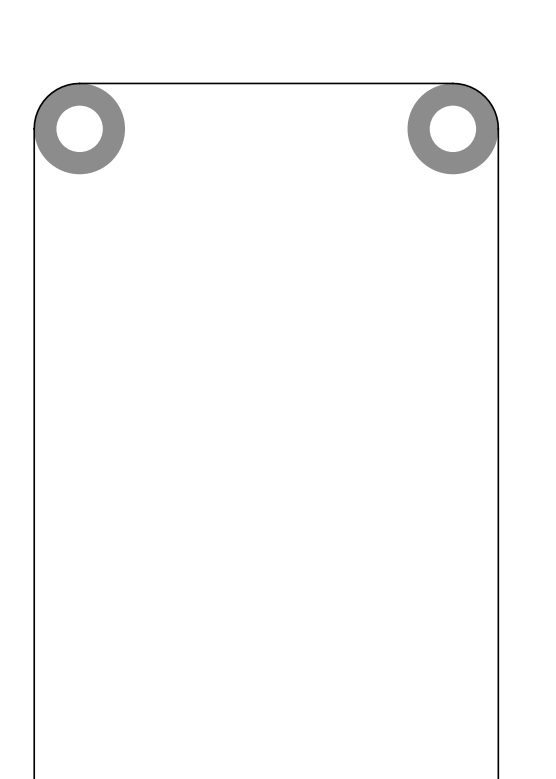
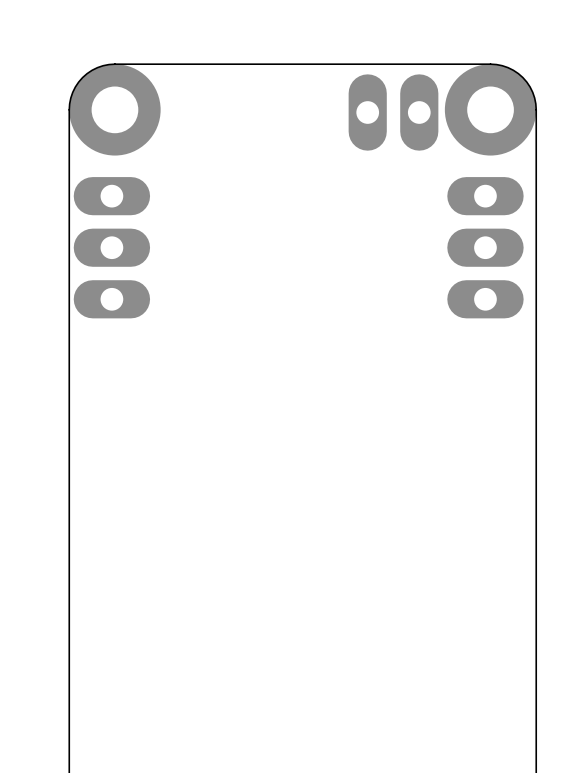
part: none -> (393, 112)
part: none -> (111, 247)
part: none -> (485, 247)

